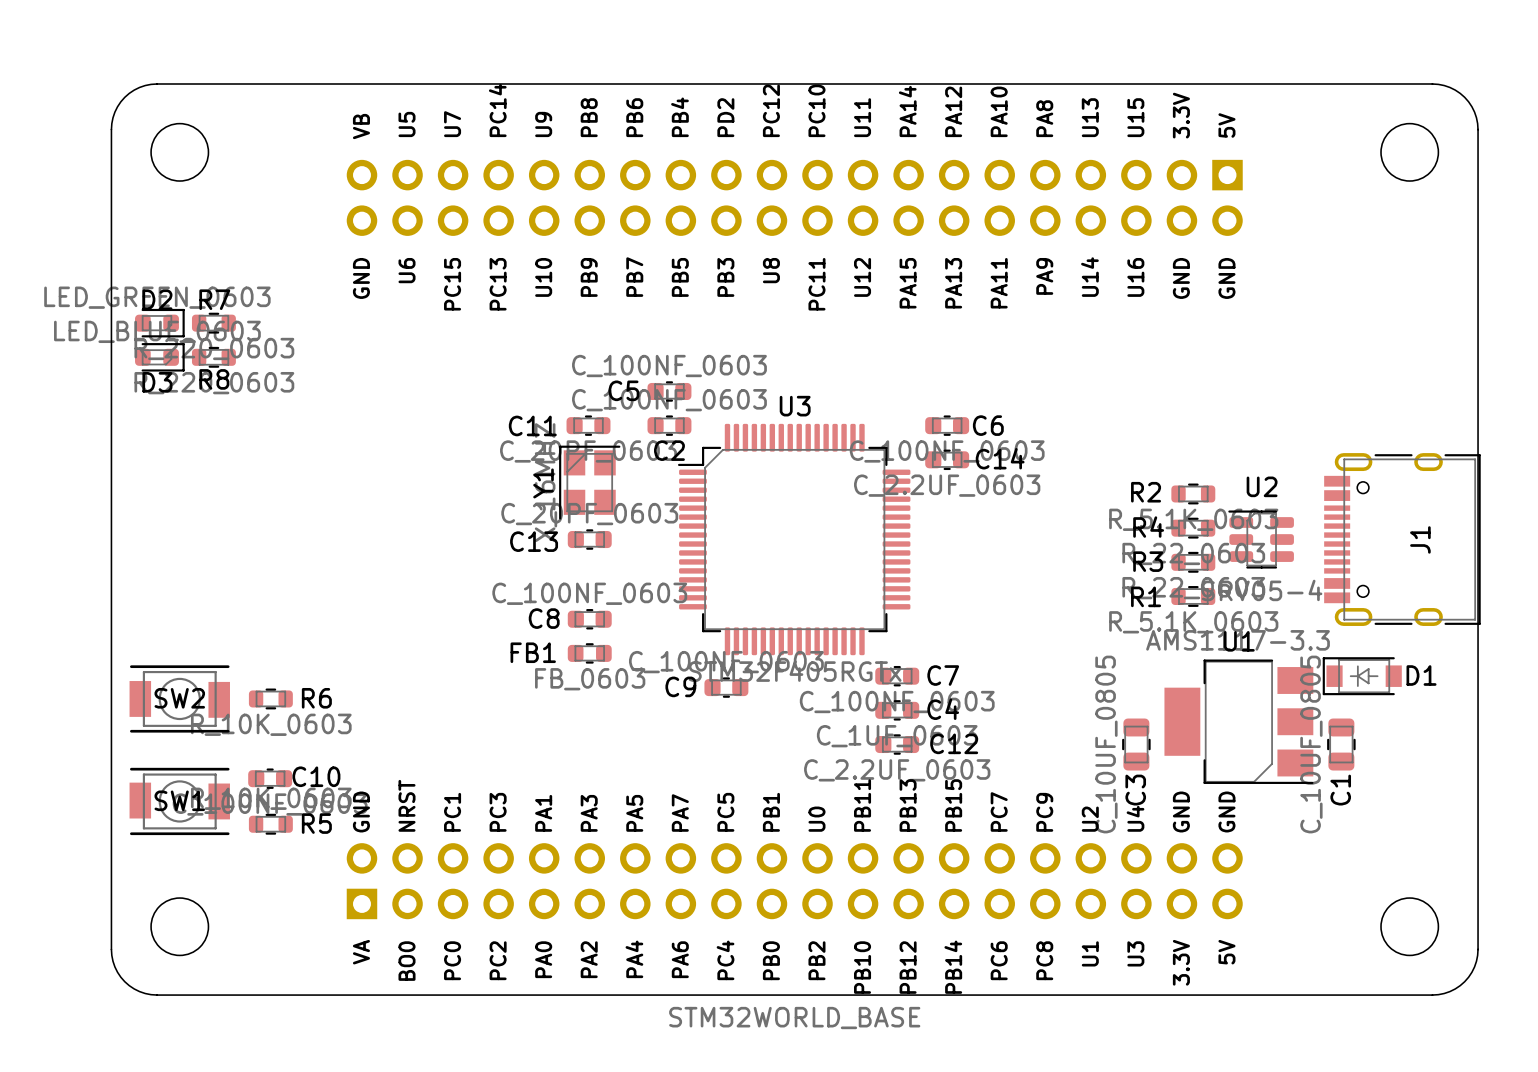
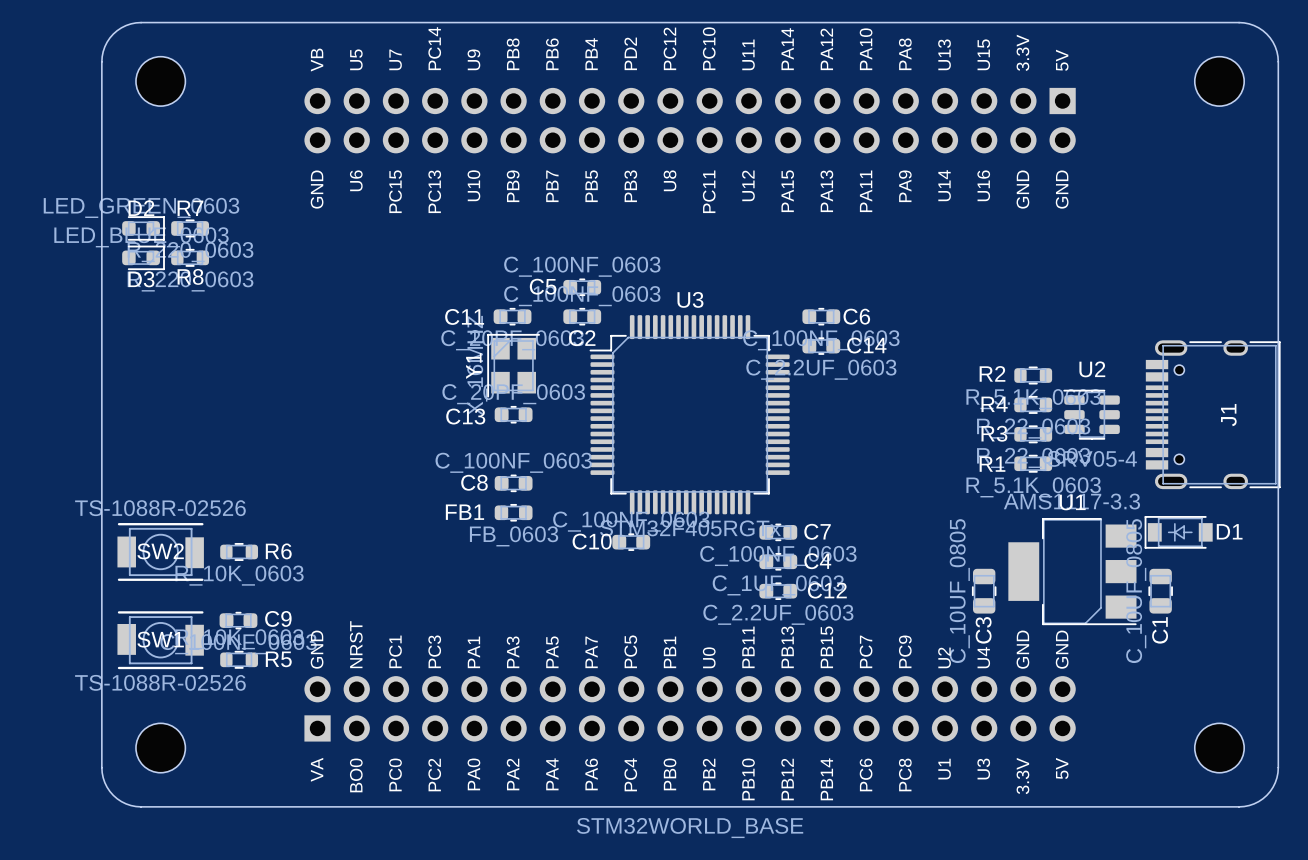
SW2 value: none -> TS-1088R-02526 (160, 508)
C9 name: C9 (680, 686) -> C10 (592, 541)
C10 name: C10 (316, 776) -> C9 (278, 618)
SW1 value: none -> TS-1088R-02526 (160, 682)

